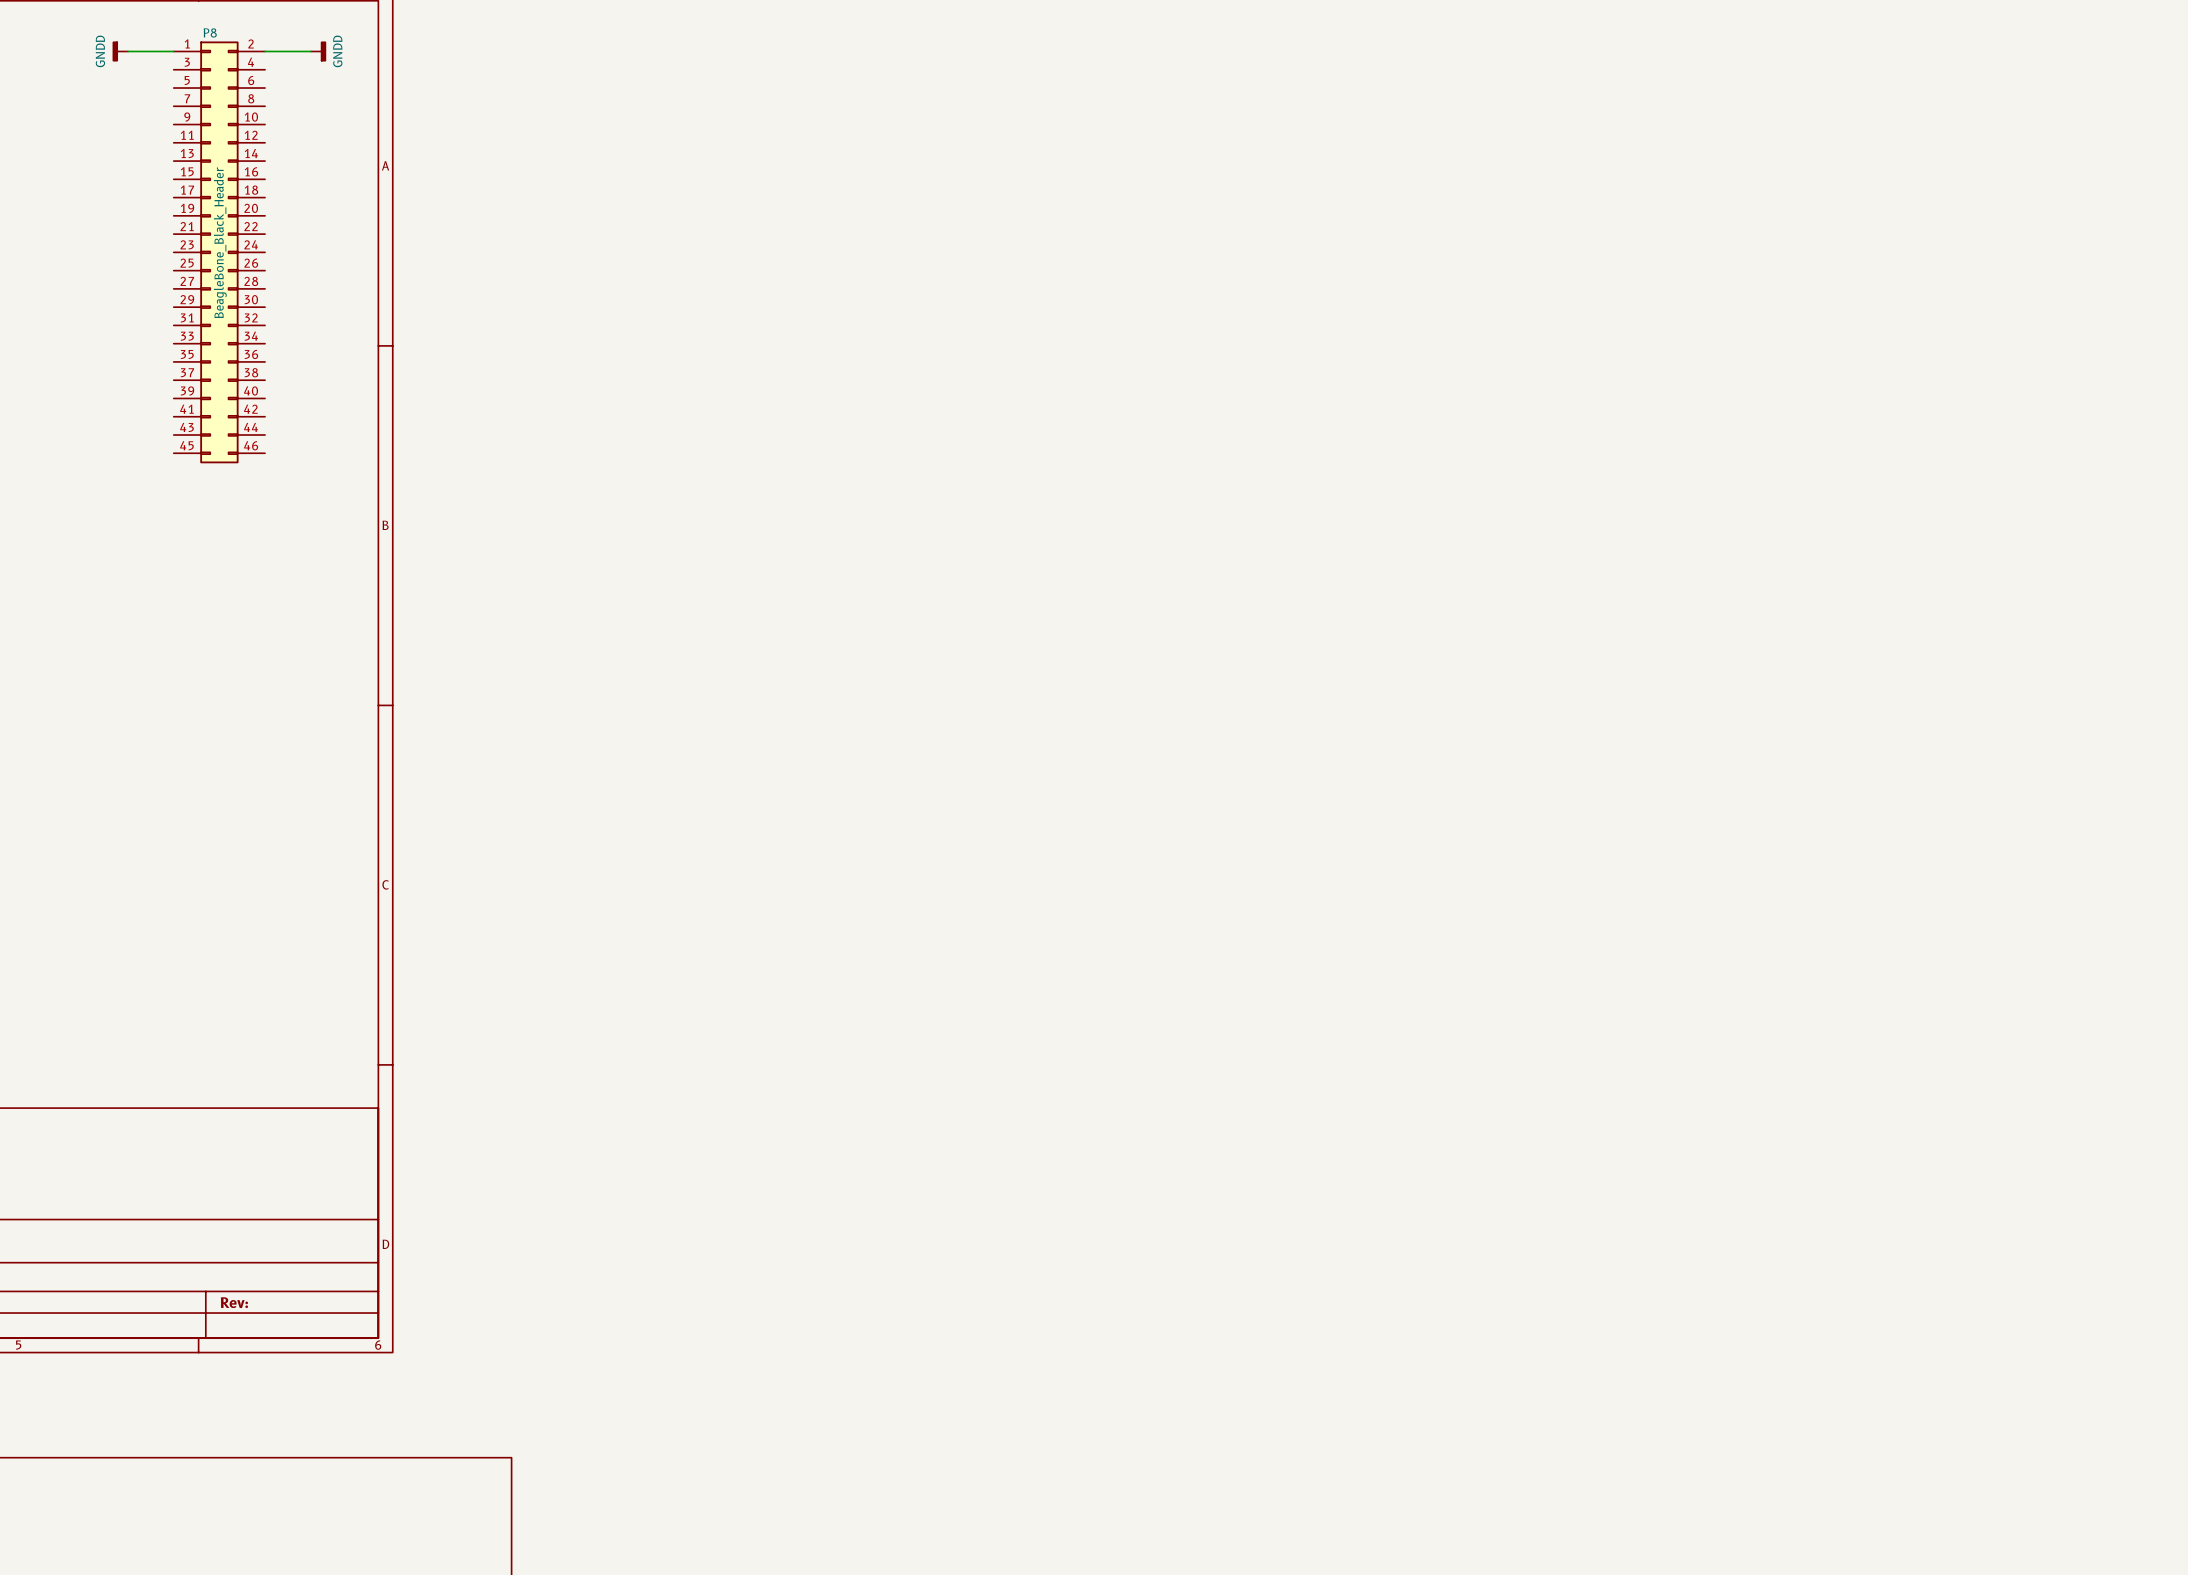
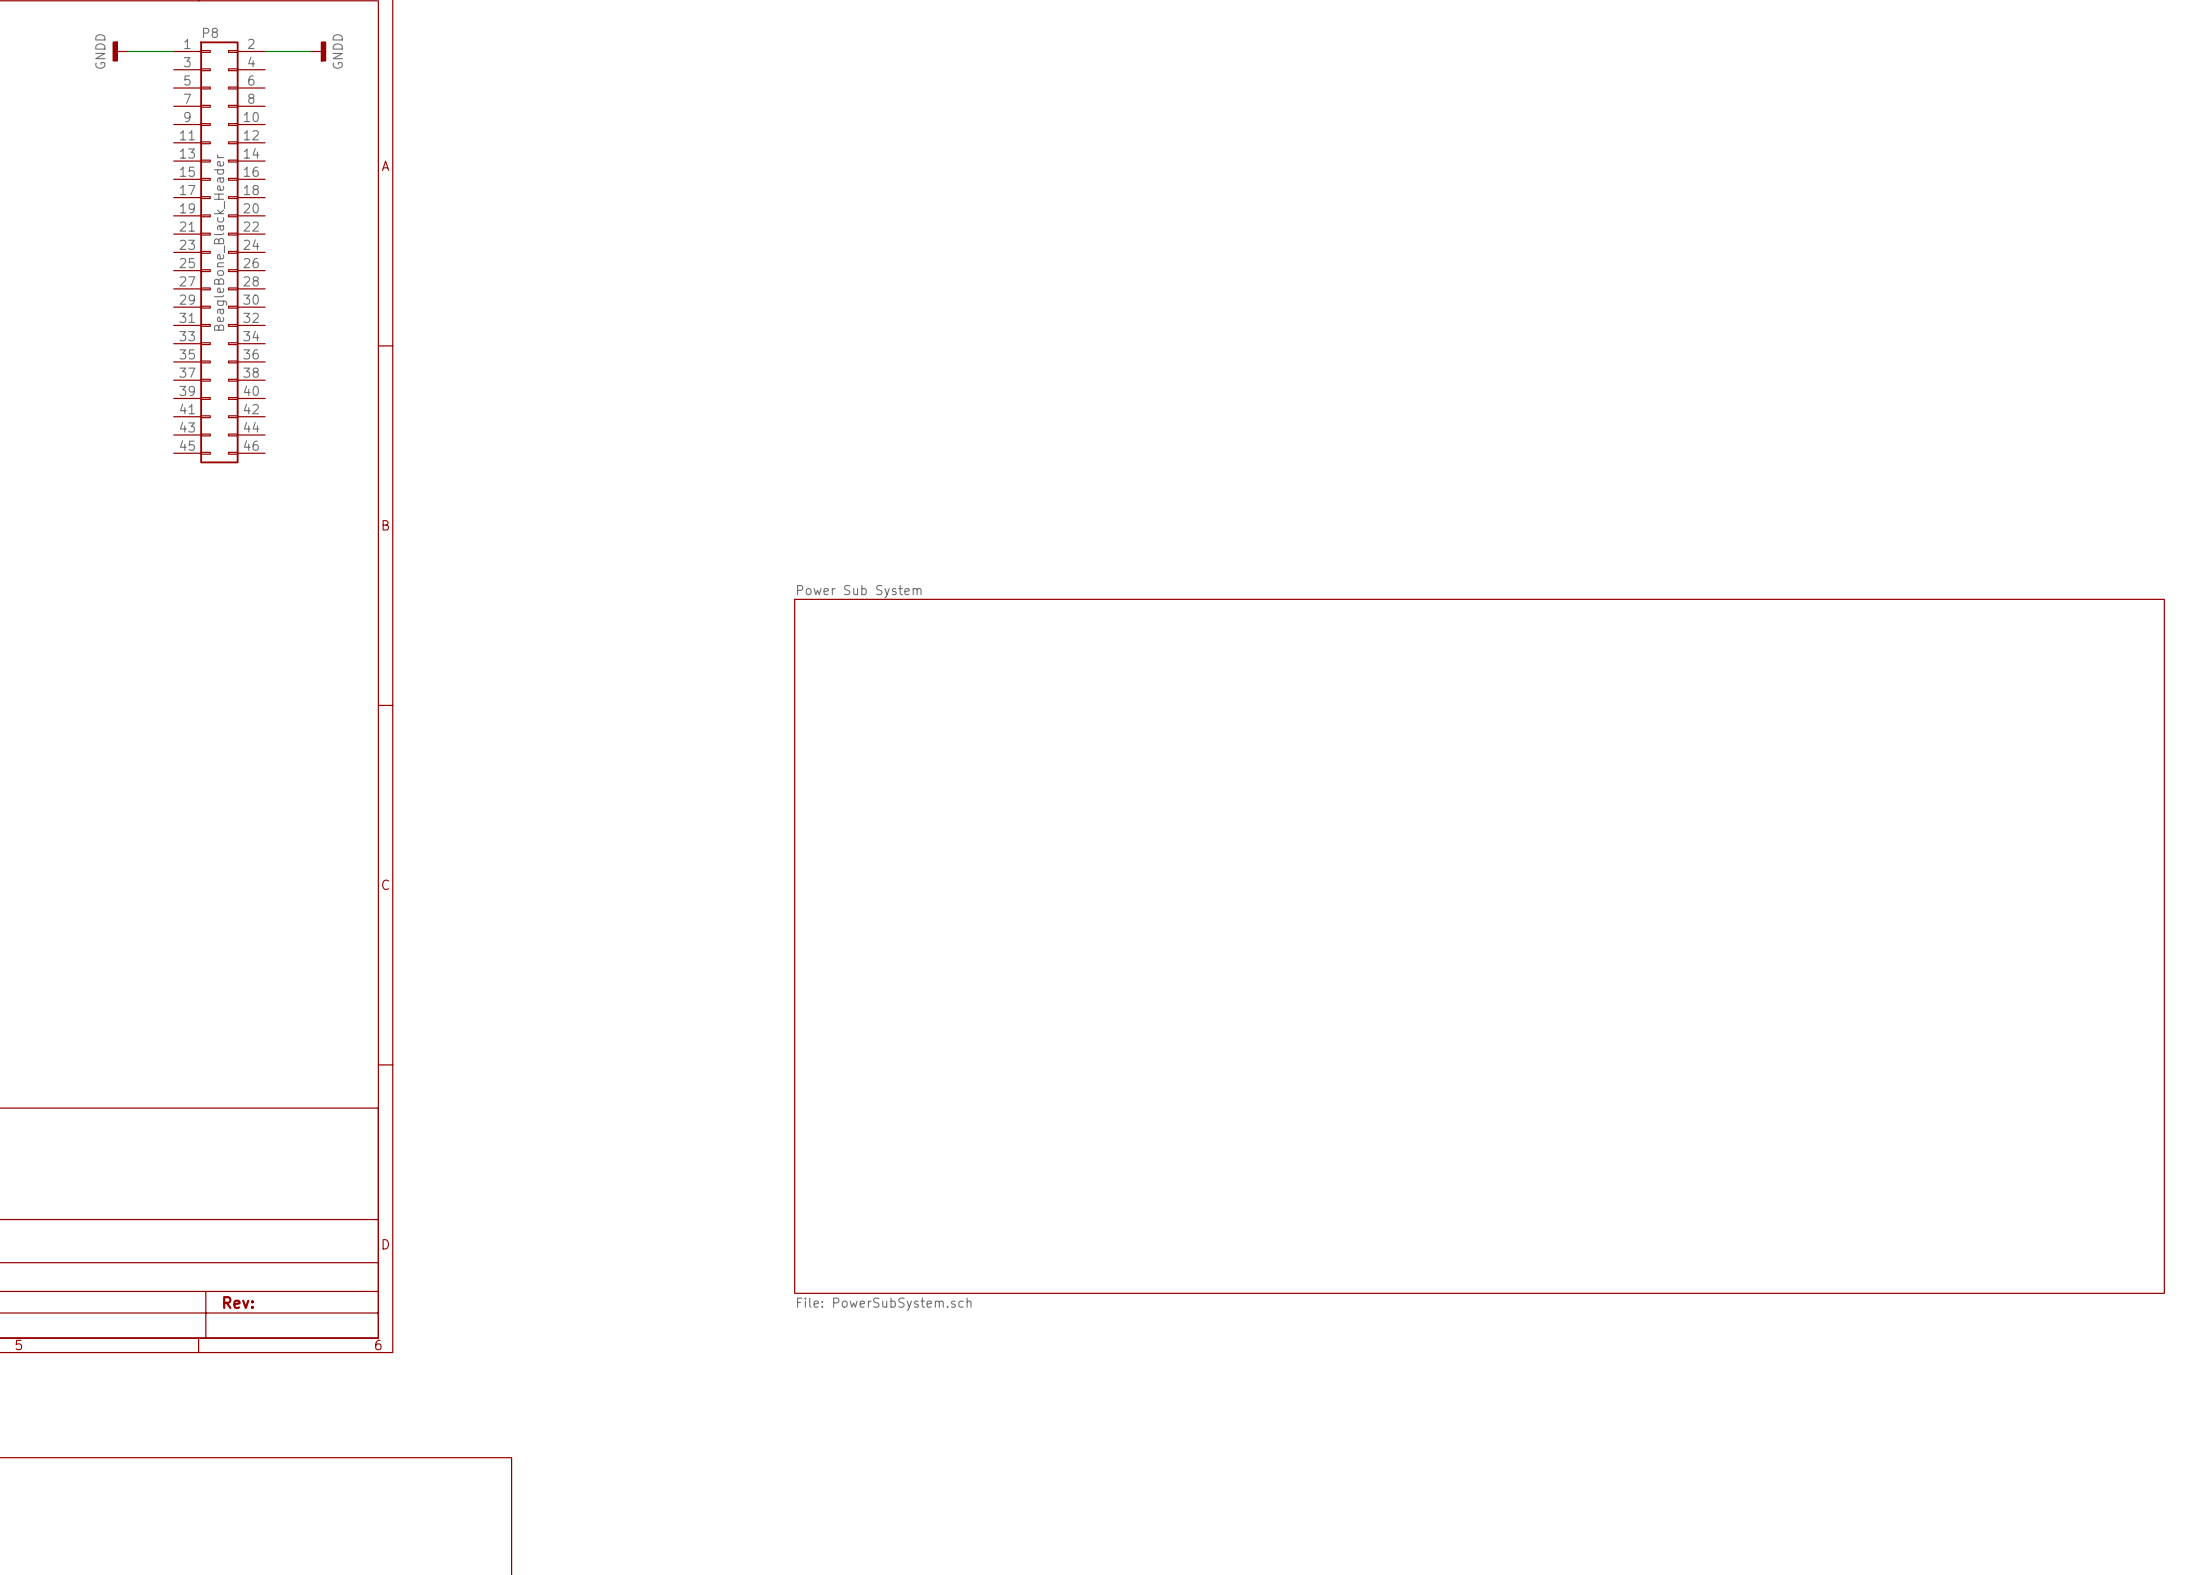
sheet Power Sub System: none -> File: PowerSubSystem.sch (1479, 946)

